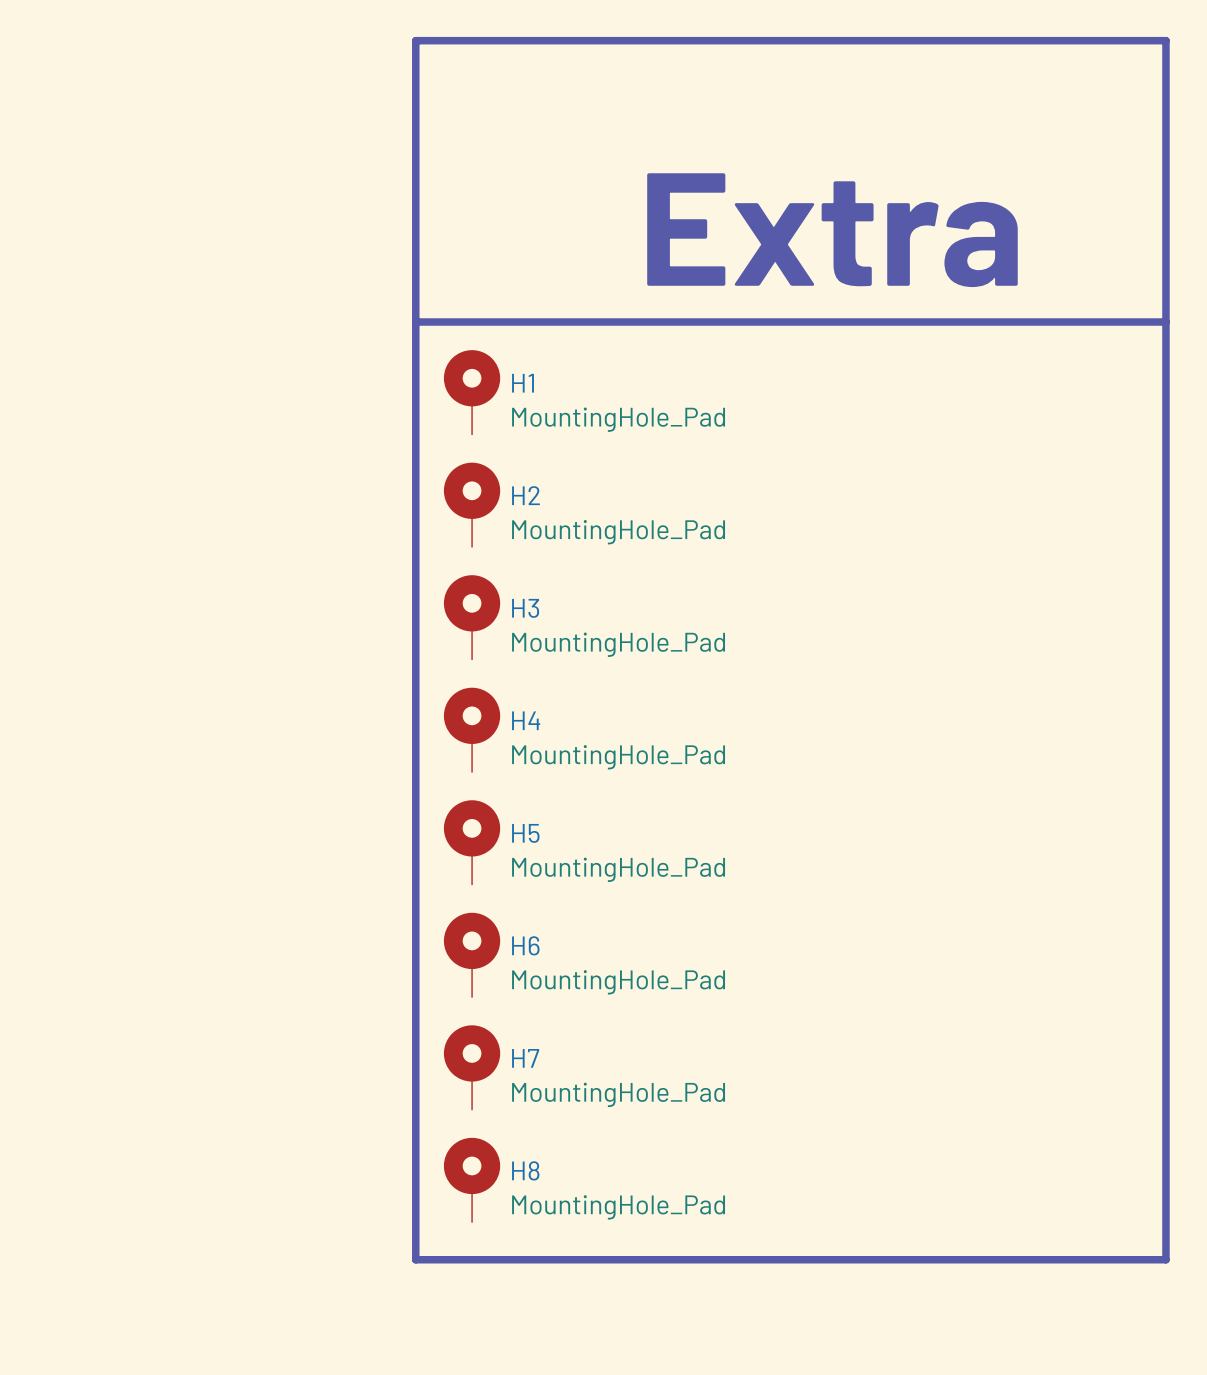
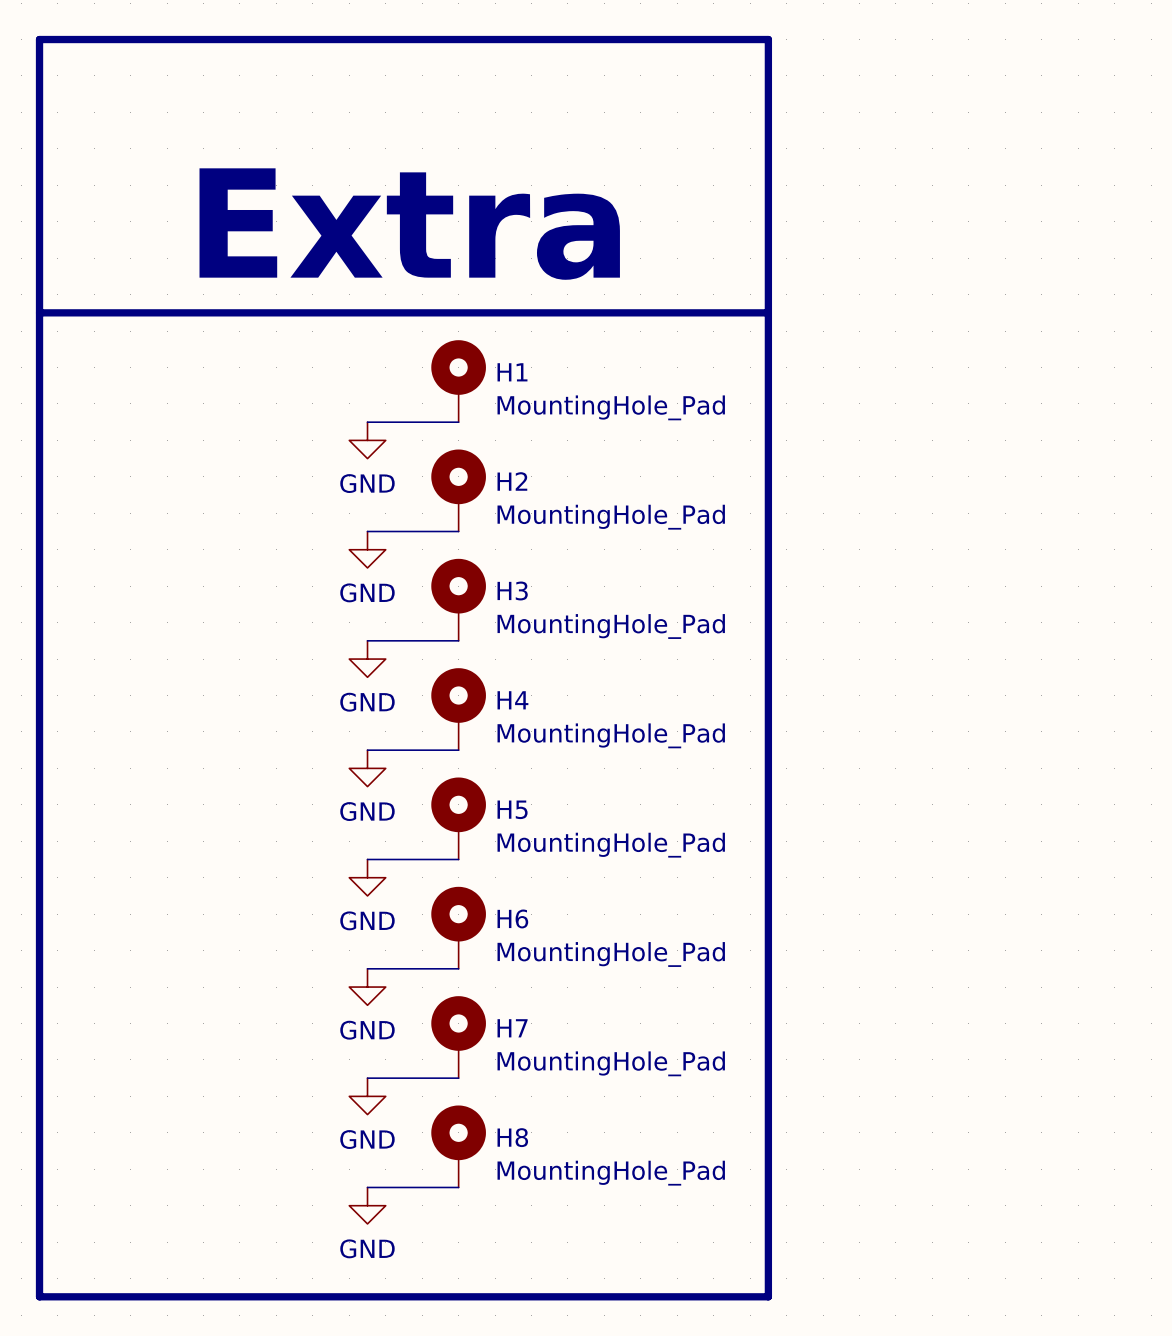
line: (415, 40) (415, 1259) (1165, 1259) (1165, 40) (790, 40) -> (403, 39) (39, 39) (39, 1296) (768, 1296) (768, 39)
text: none -> Extra (409, 224)
text: Extra (832, 230) -> none
line: none -> (39, 312) (403, 312)
line: (790, 322) (1165, 322) -> none
wire: none -> (367, 422) (458, 422)
power symbol: none -> GND (367, 440)
wire: none -> (367, 531) (458, 531)
power symbol: none -> GND (367, 549)
wire: none -> (367, 640) (458, 640)
power symbol: none -> GND (367, 659)
wire: none -> (367, 750) (458, 750)
power symbol: none -> GND (367, 768)
wire: none -> (367, 859) (458, 859)
power symbol: none -> GND (367, 877)
wire: none -> (367, 968) (458, 968)
power symbol: none -> GND (367, 987)
wire: none -> (367, 1078) (458, 1078)
power symbol: none -> GND (367, 1096)
wire: none -> (367, 1187) (458, 1187)
power symbol: none -> GND (367, 1205)

